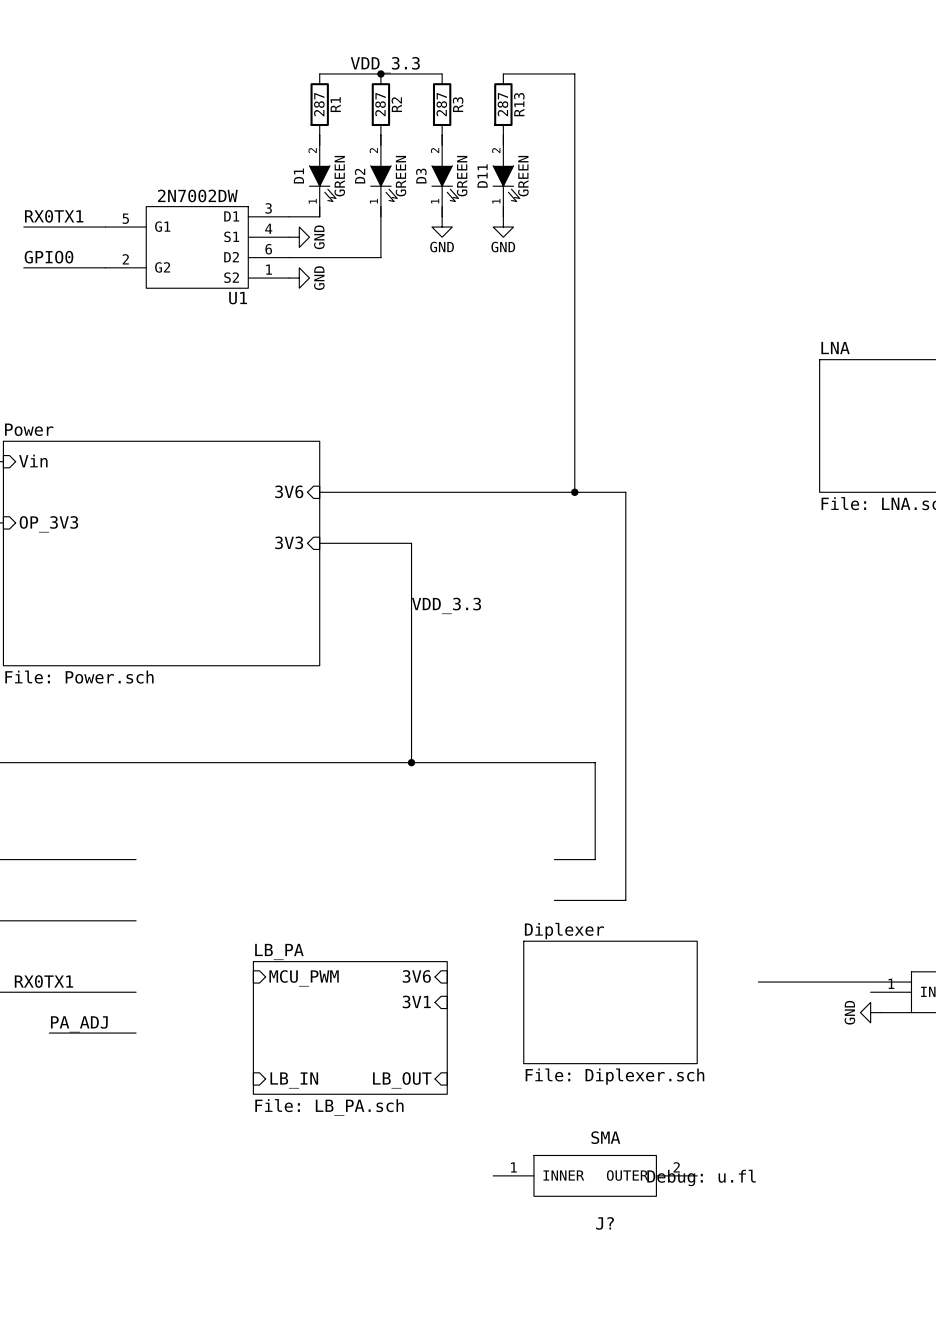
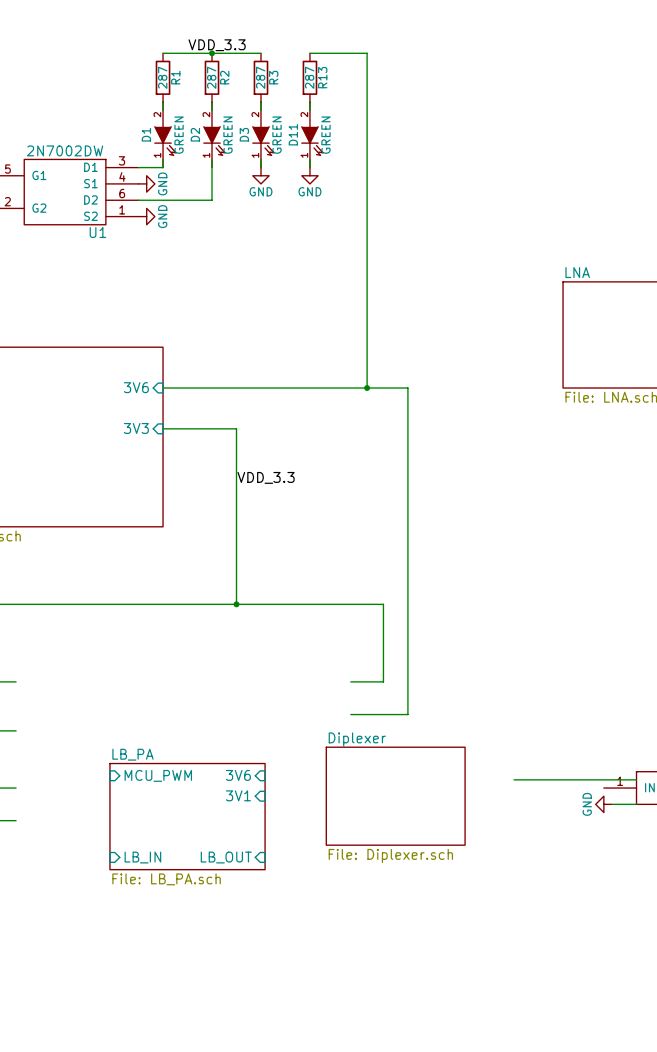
J?: SMA (595, 1175) -> none
text: Debug: u.fl (701, 1177) -> none

